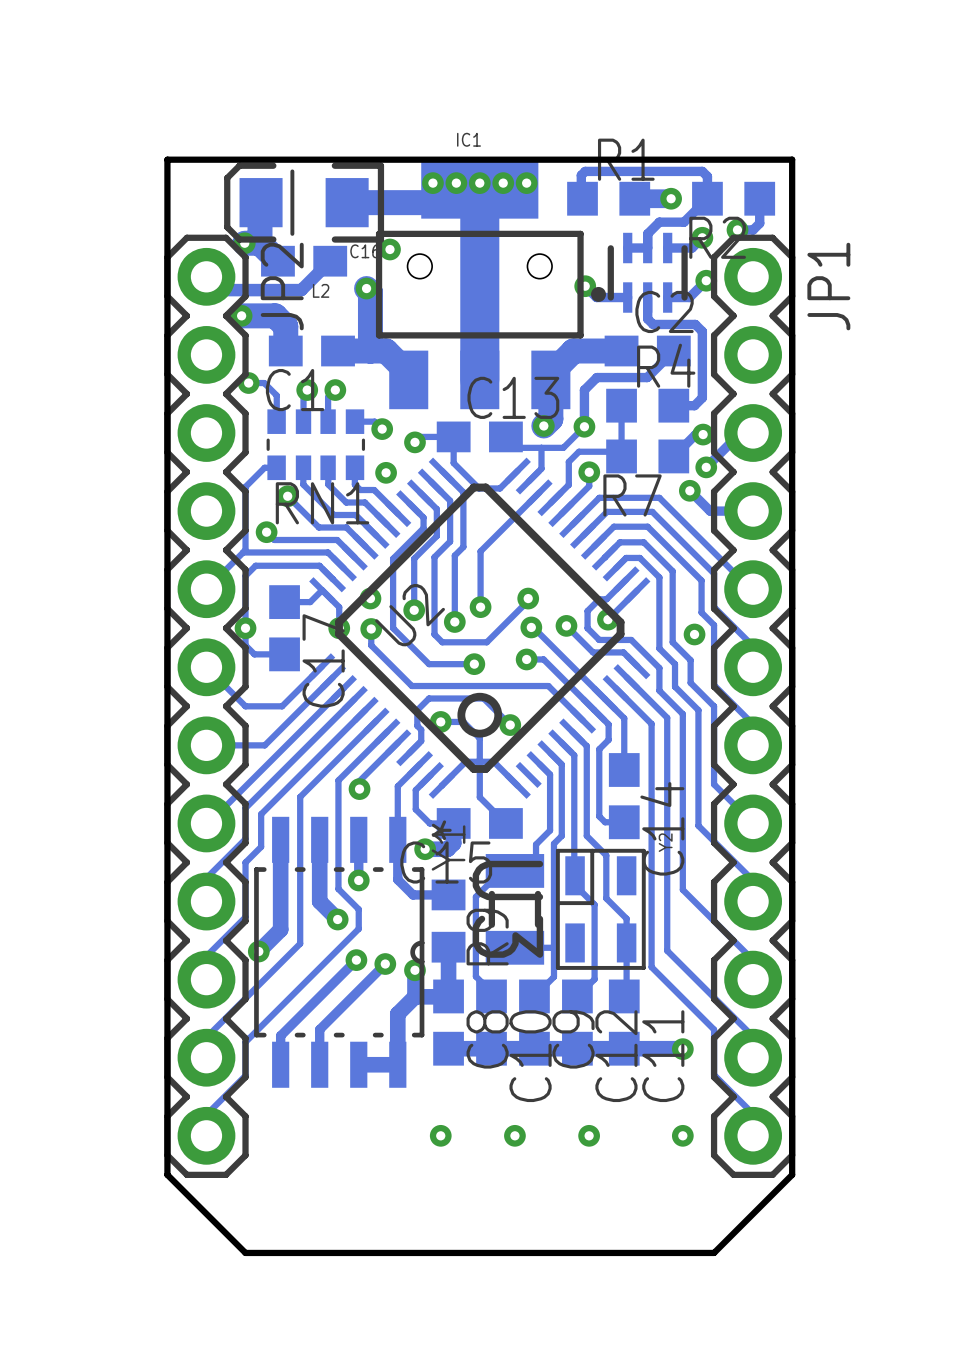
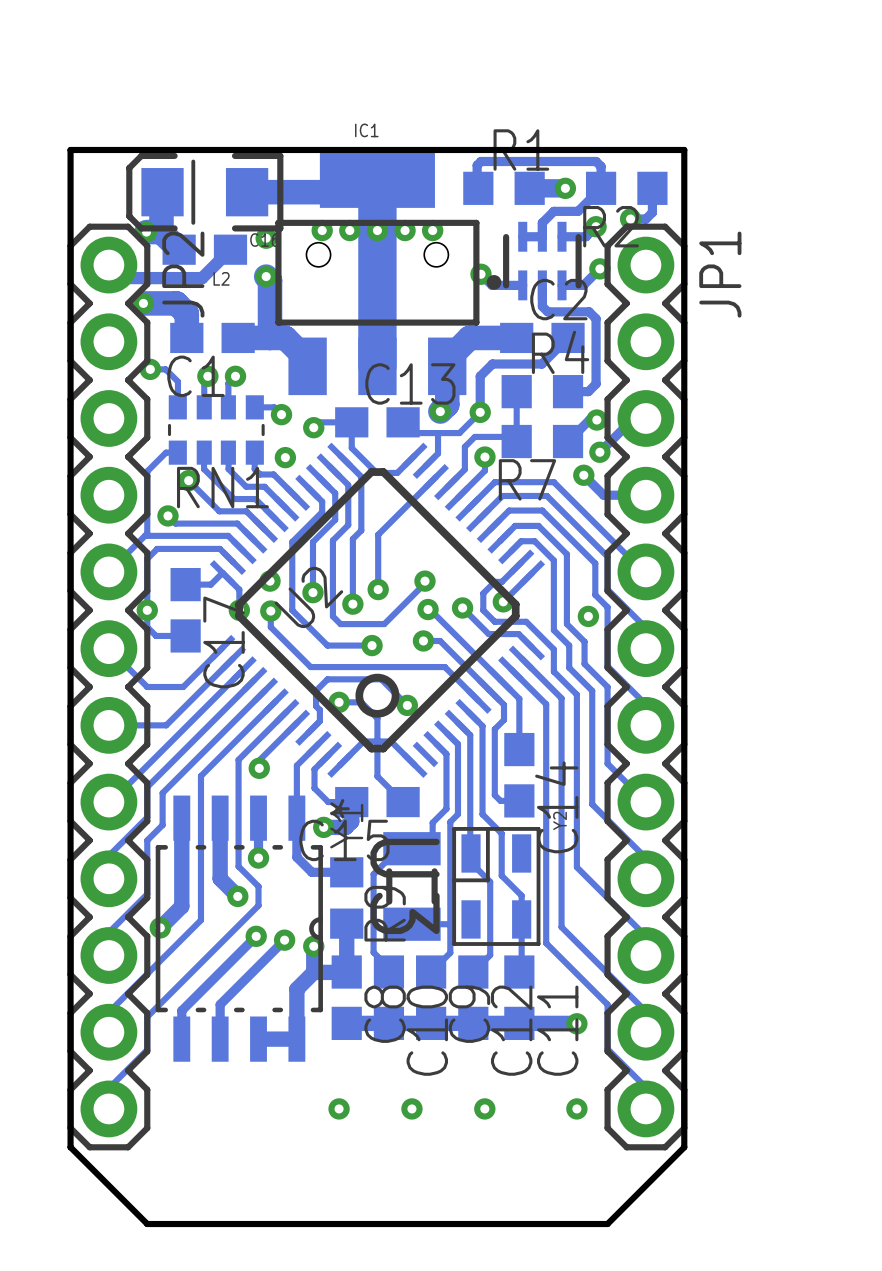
via: (432, 183) -> none
via: (456, 183) -> none
via: (479, 183) -> none
via: (503, 183) -> none
via: (526, 183) -> none
via: none -> (322, 230)
via: none -> (349, 230)
via: none -> (377, 230)
via: none -> (405, 230)
via: none -> (432, 230)
via: none -> (266, 238)
via: (389, 249) -> none

